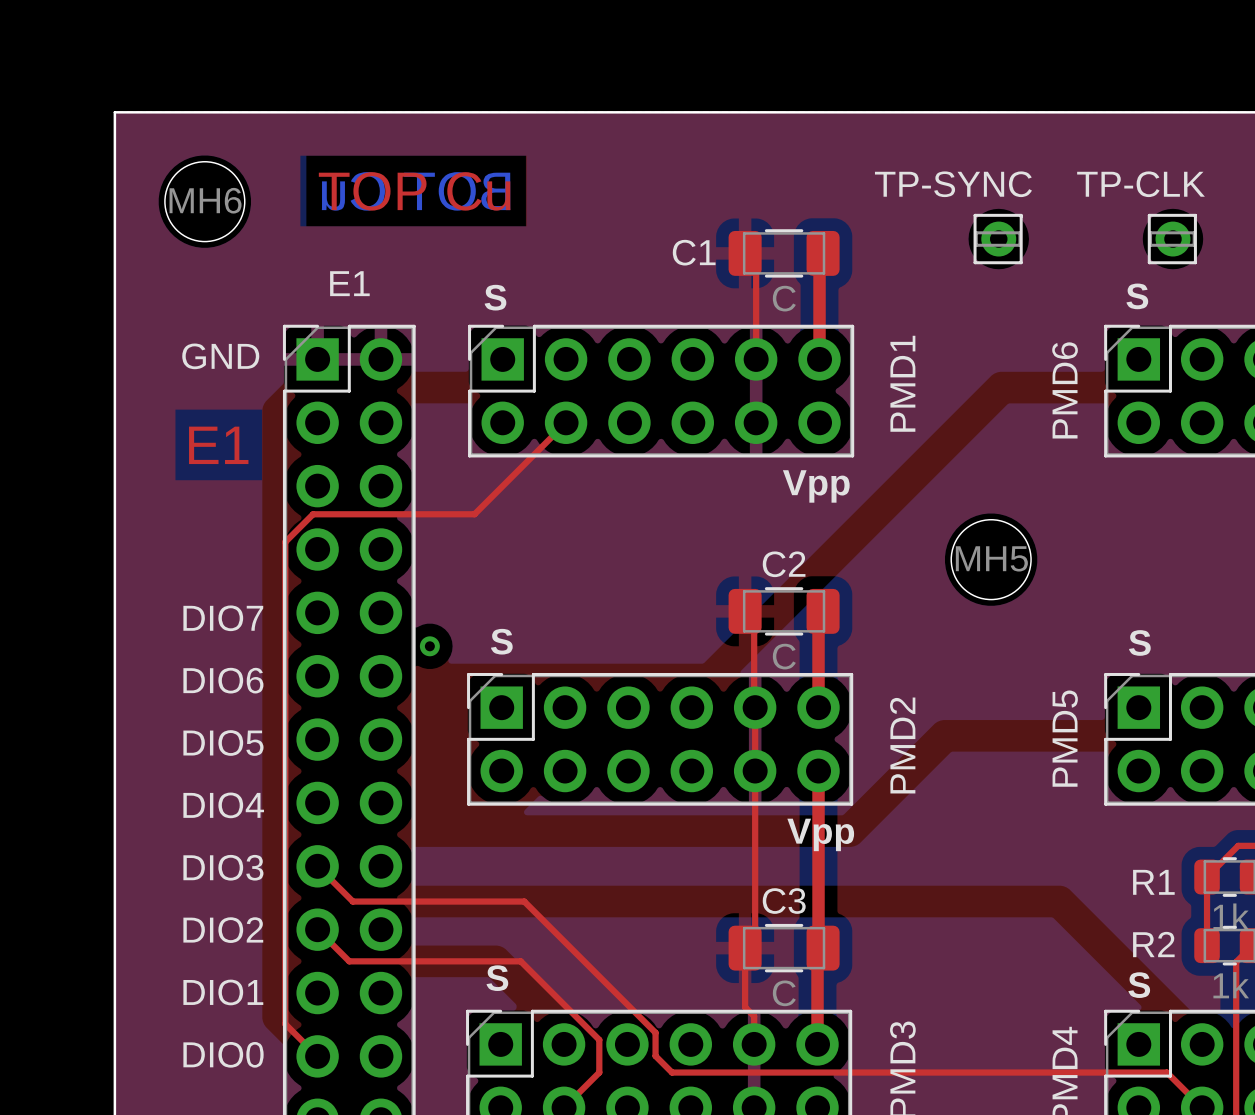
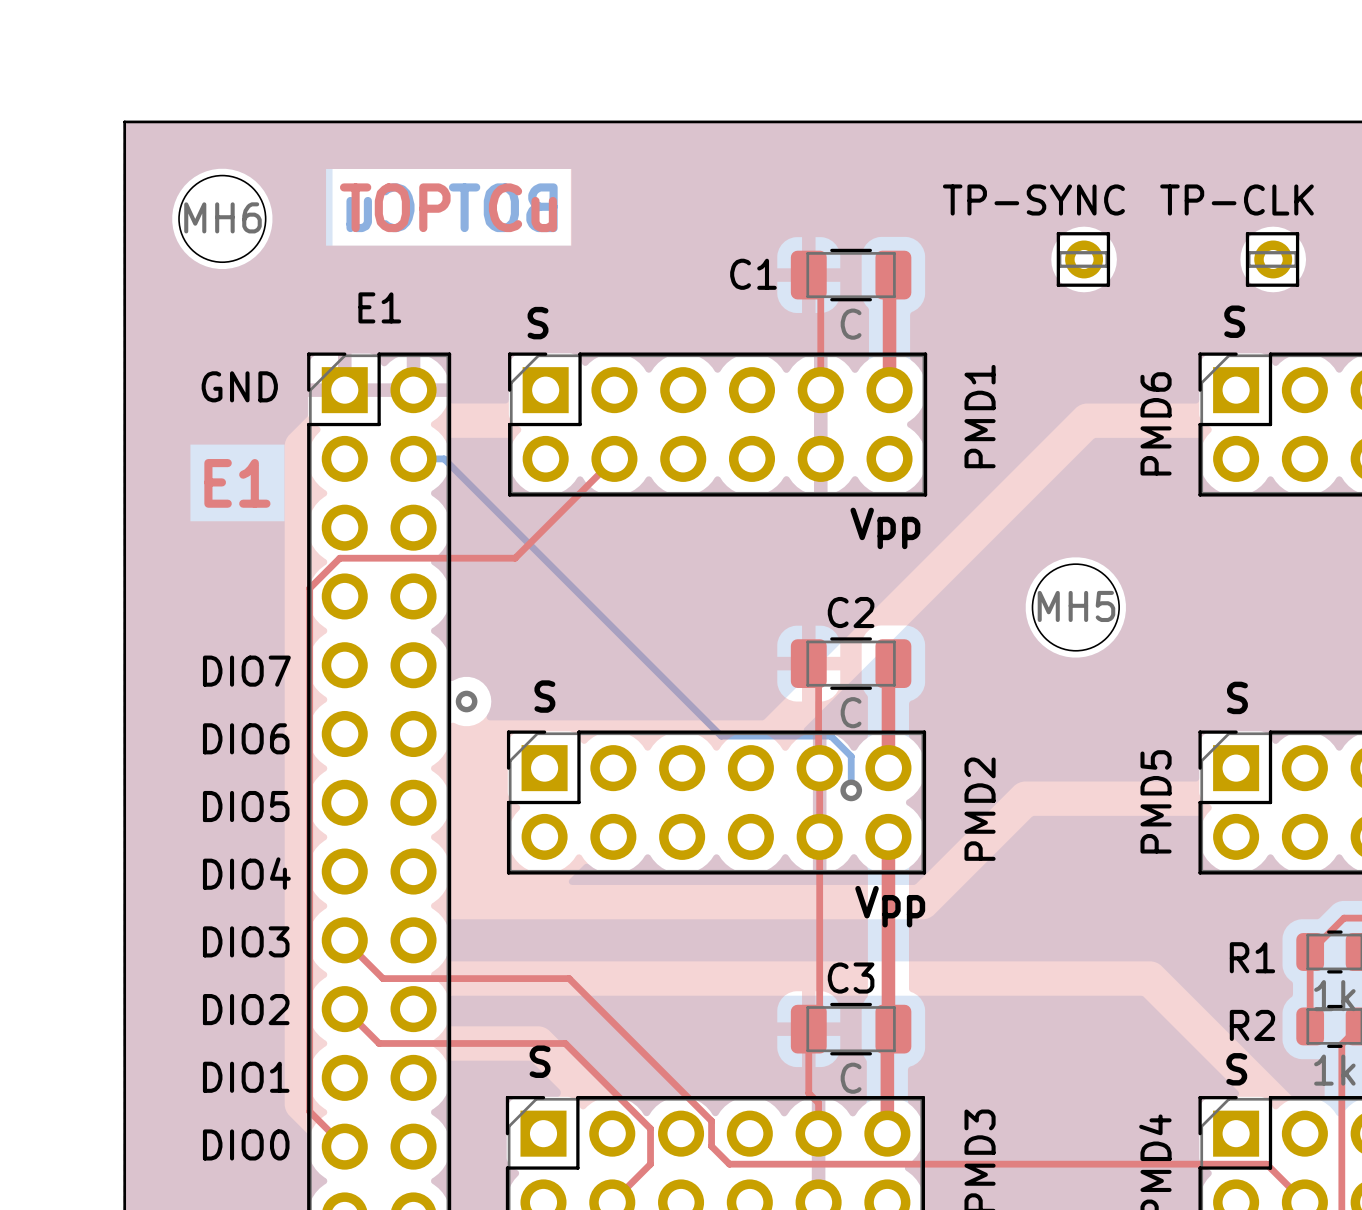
bottom track: none -> (413, 458) (444, 458) (721, 736) (830, 736) (851, 756) (851, 790)
via: none -> (851, 790)

